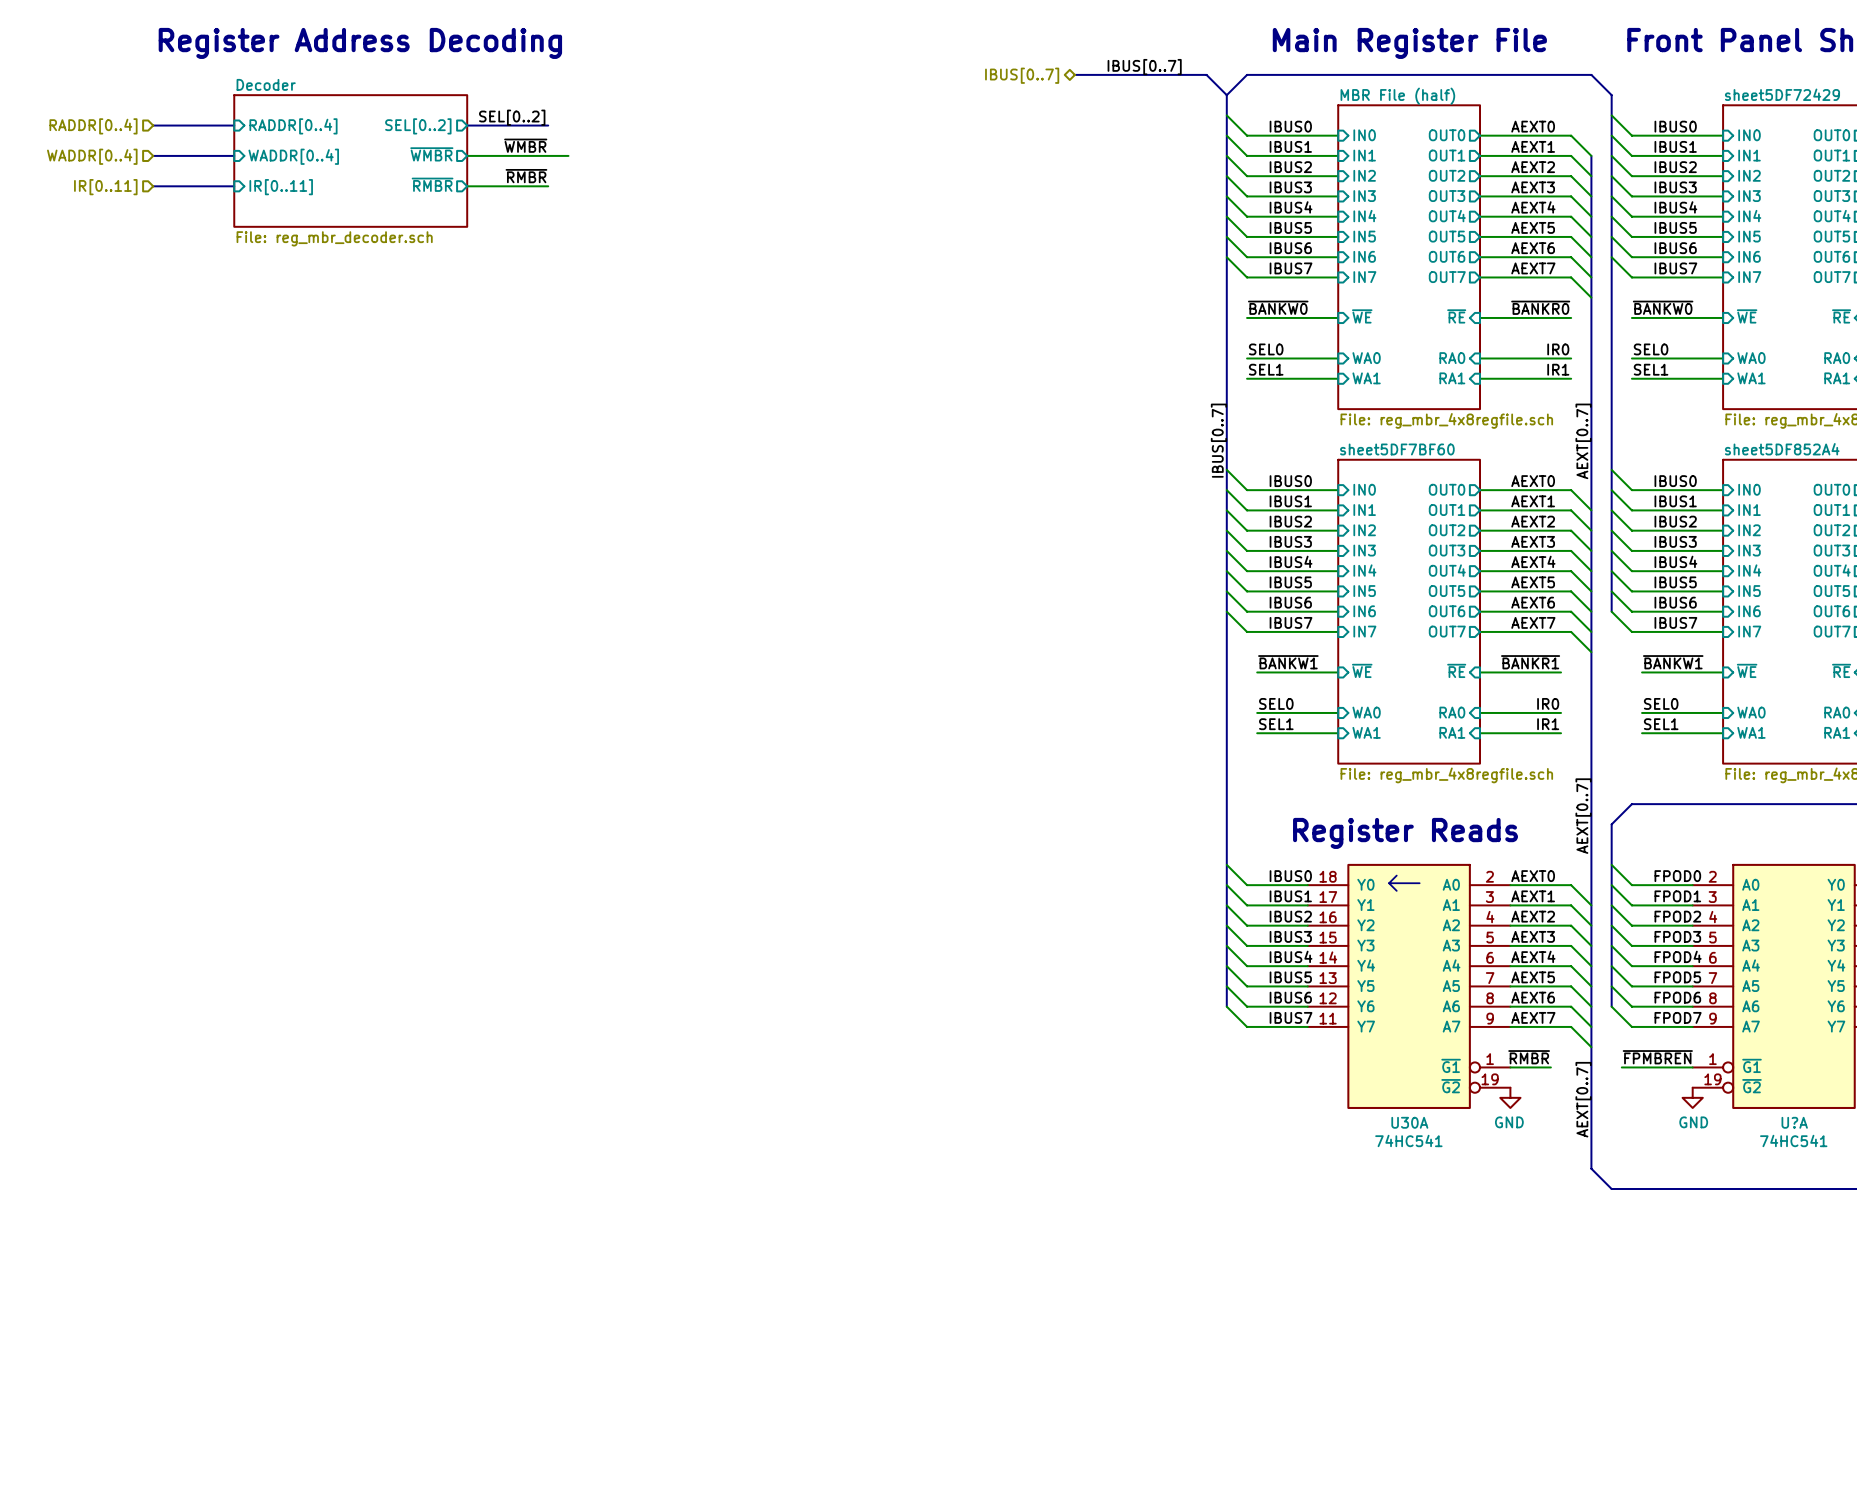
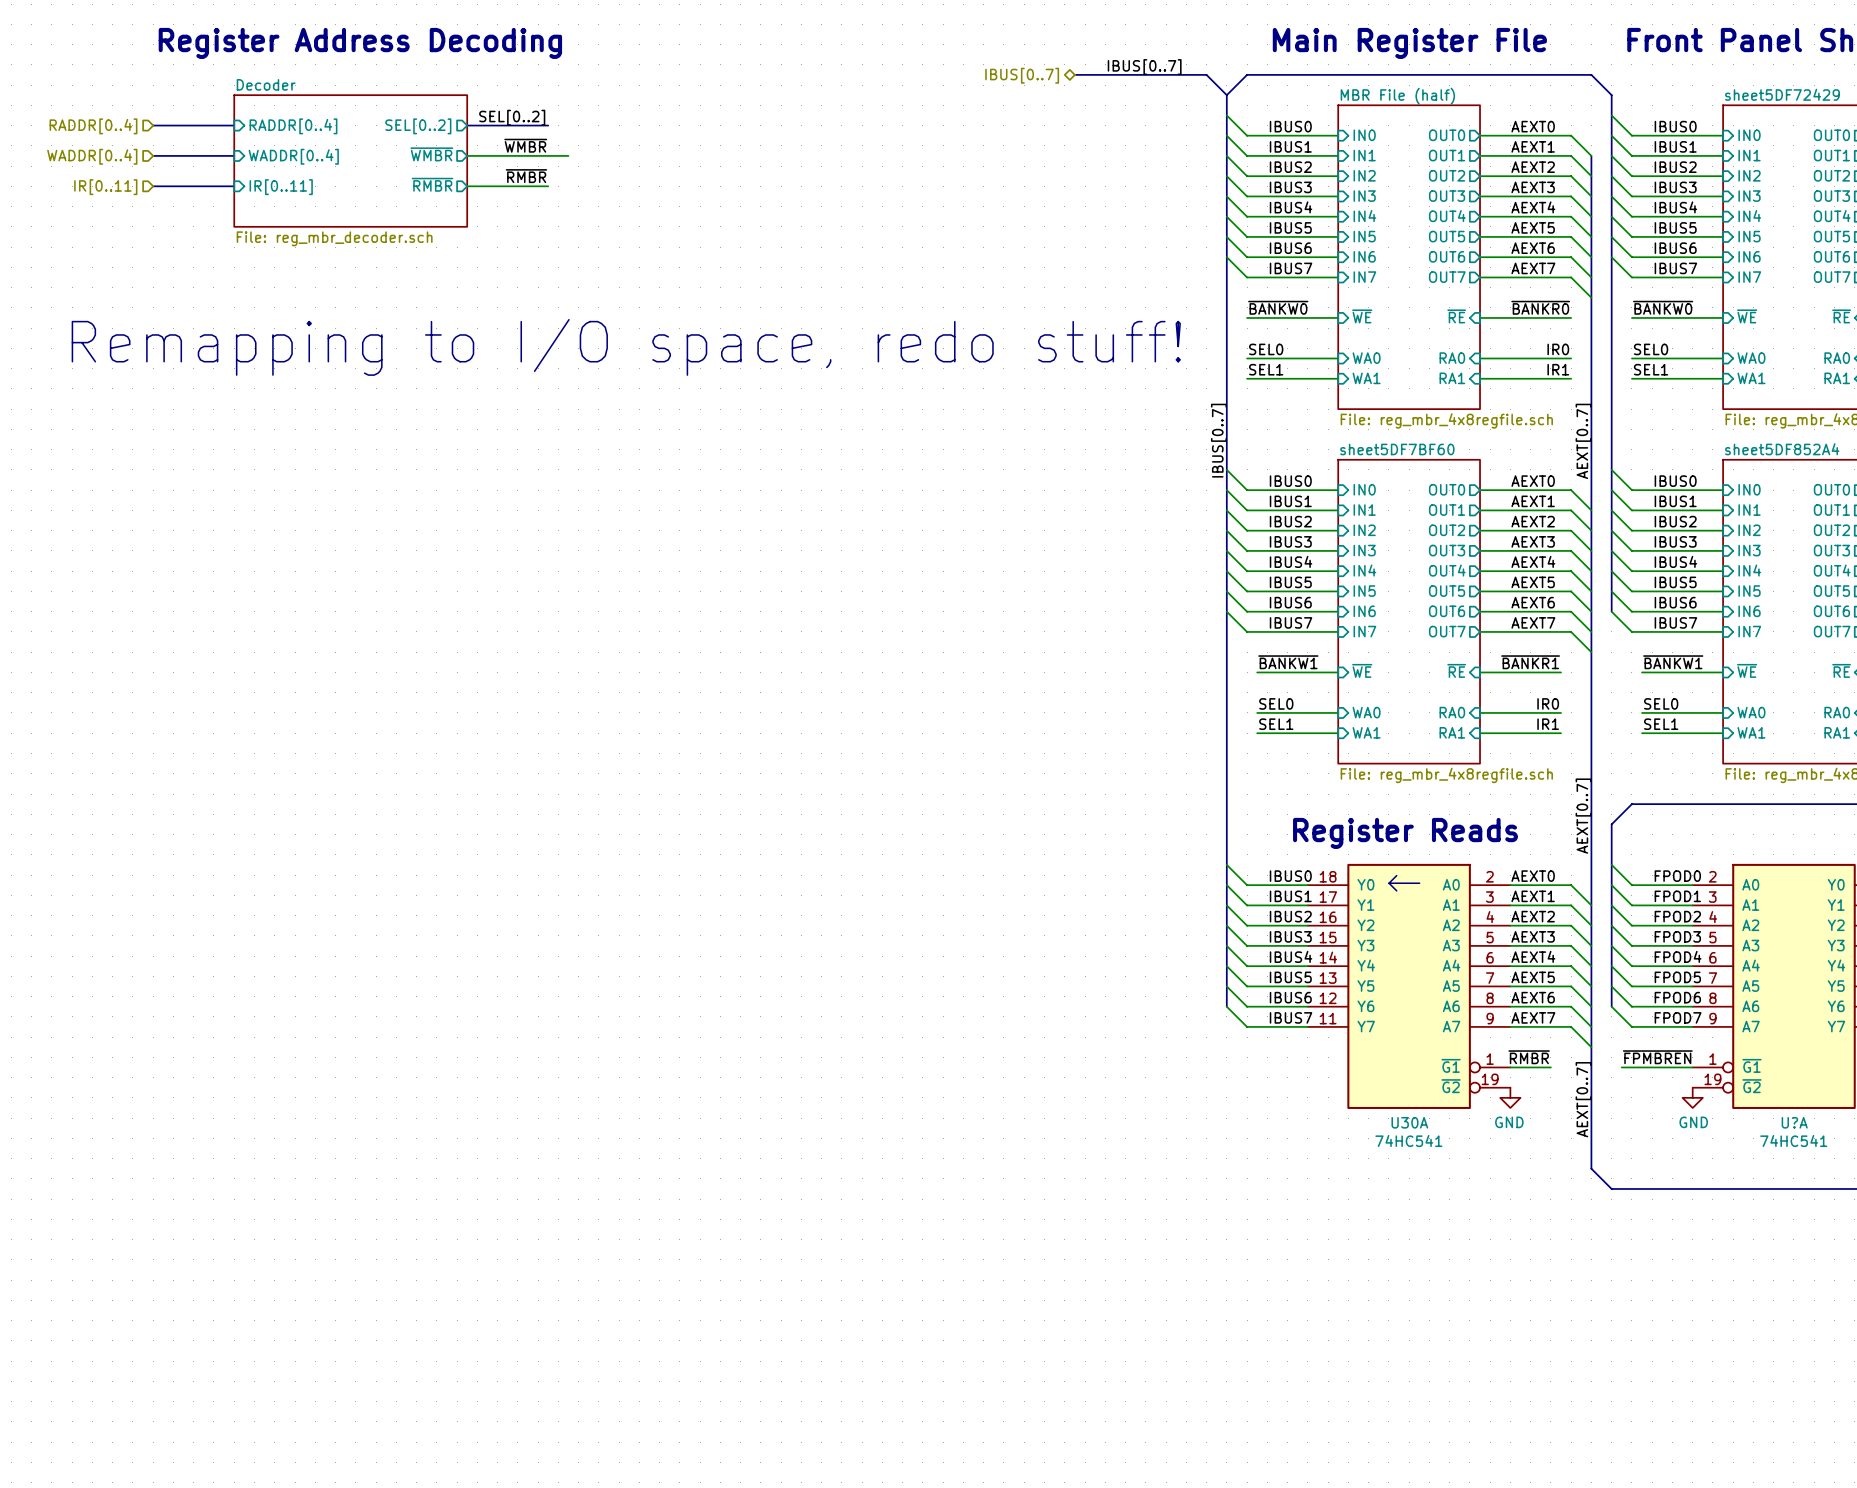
text: none -> Remapping to I/O space, redo stuff! (626, 347)

